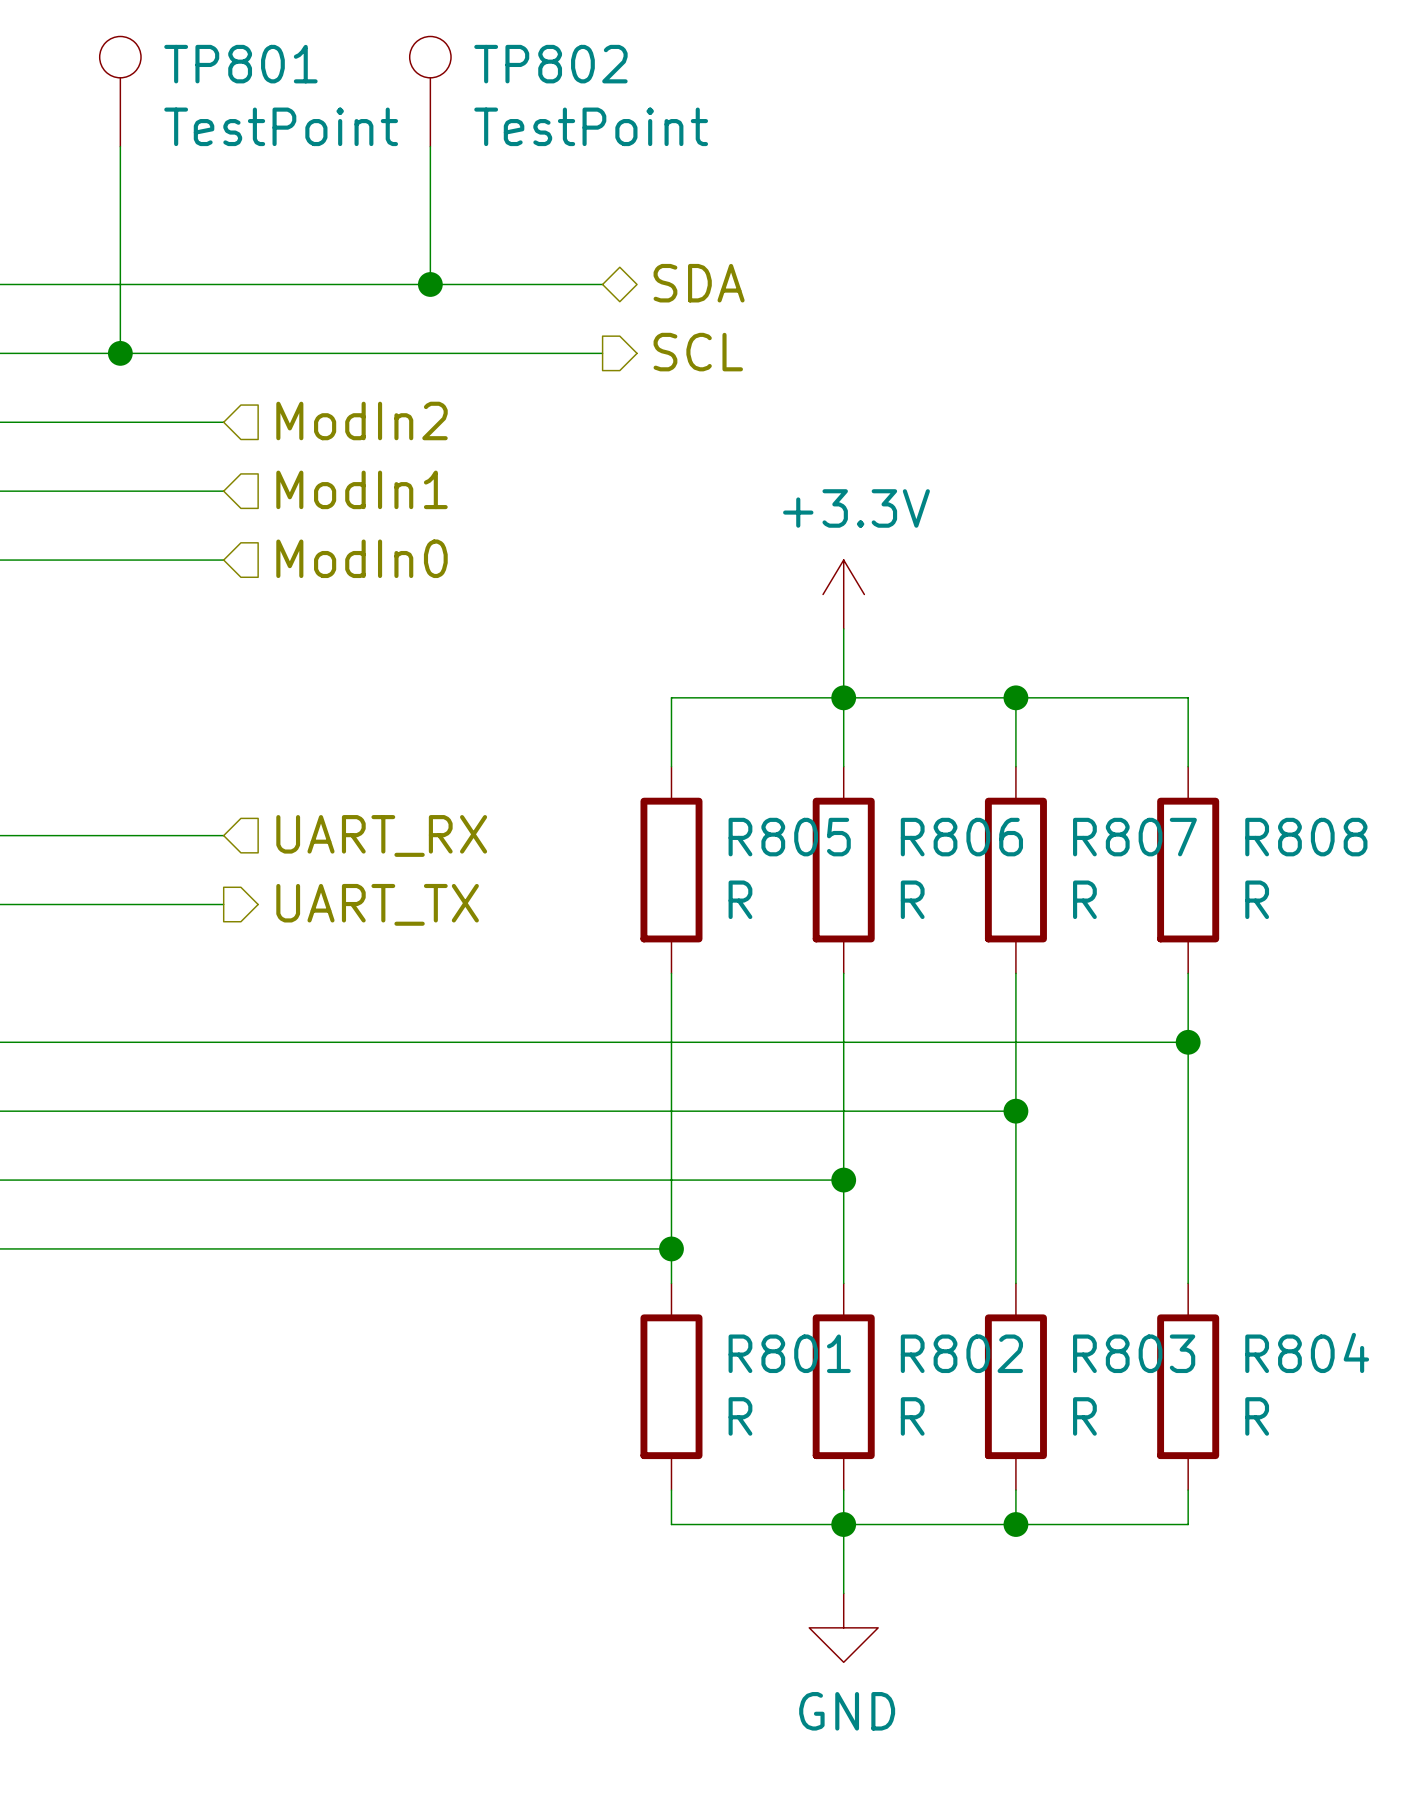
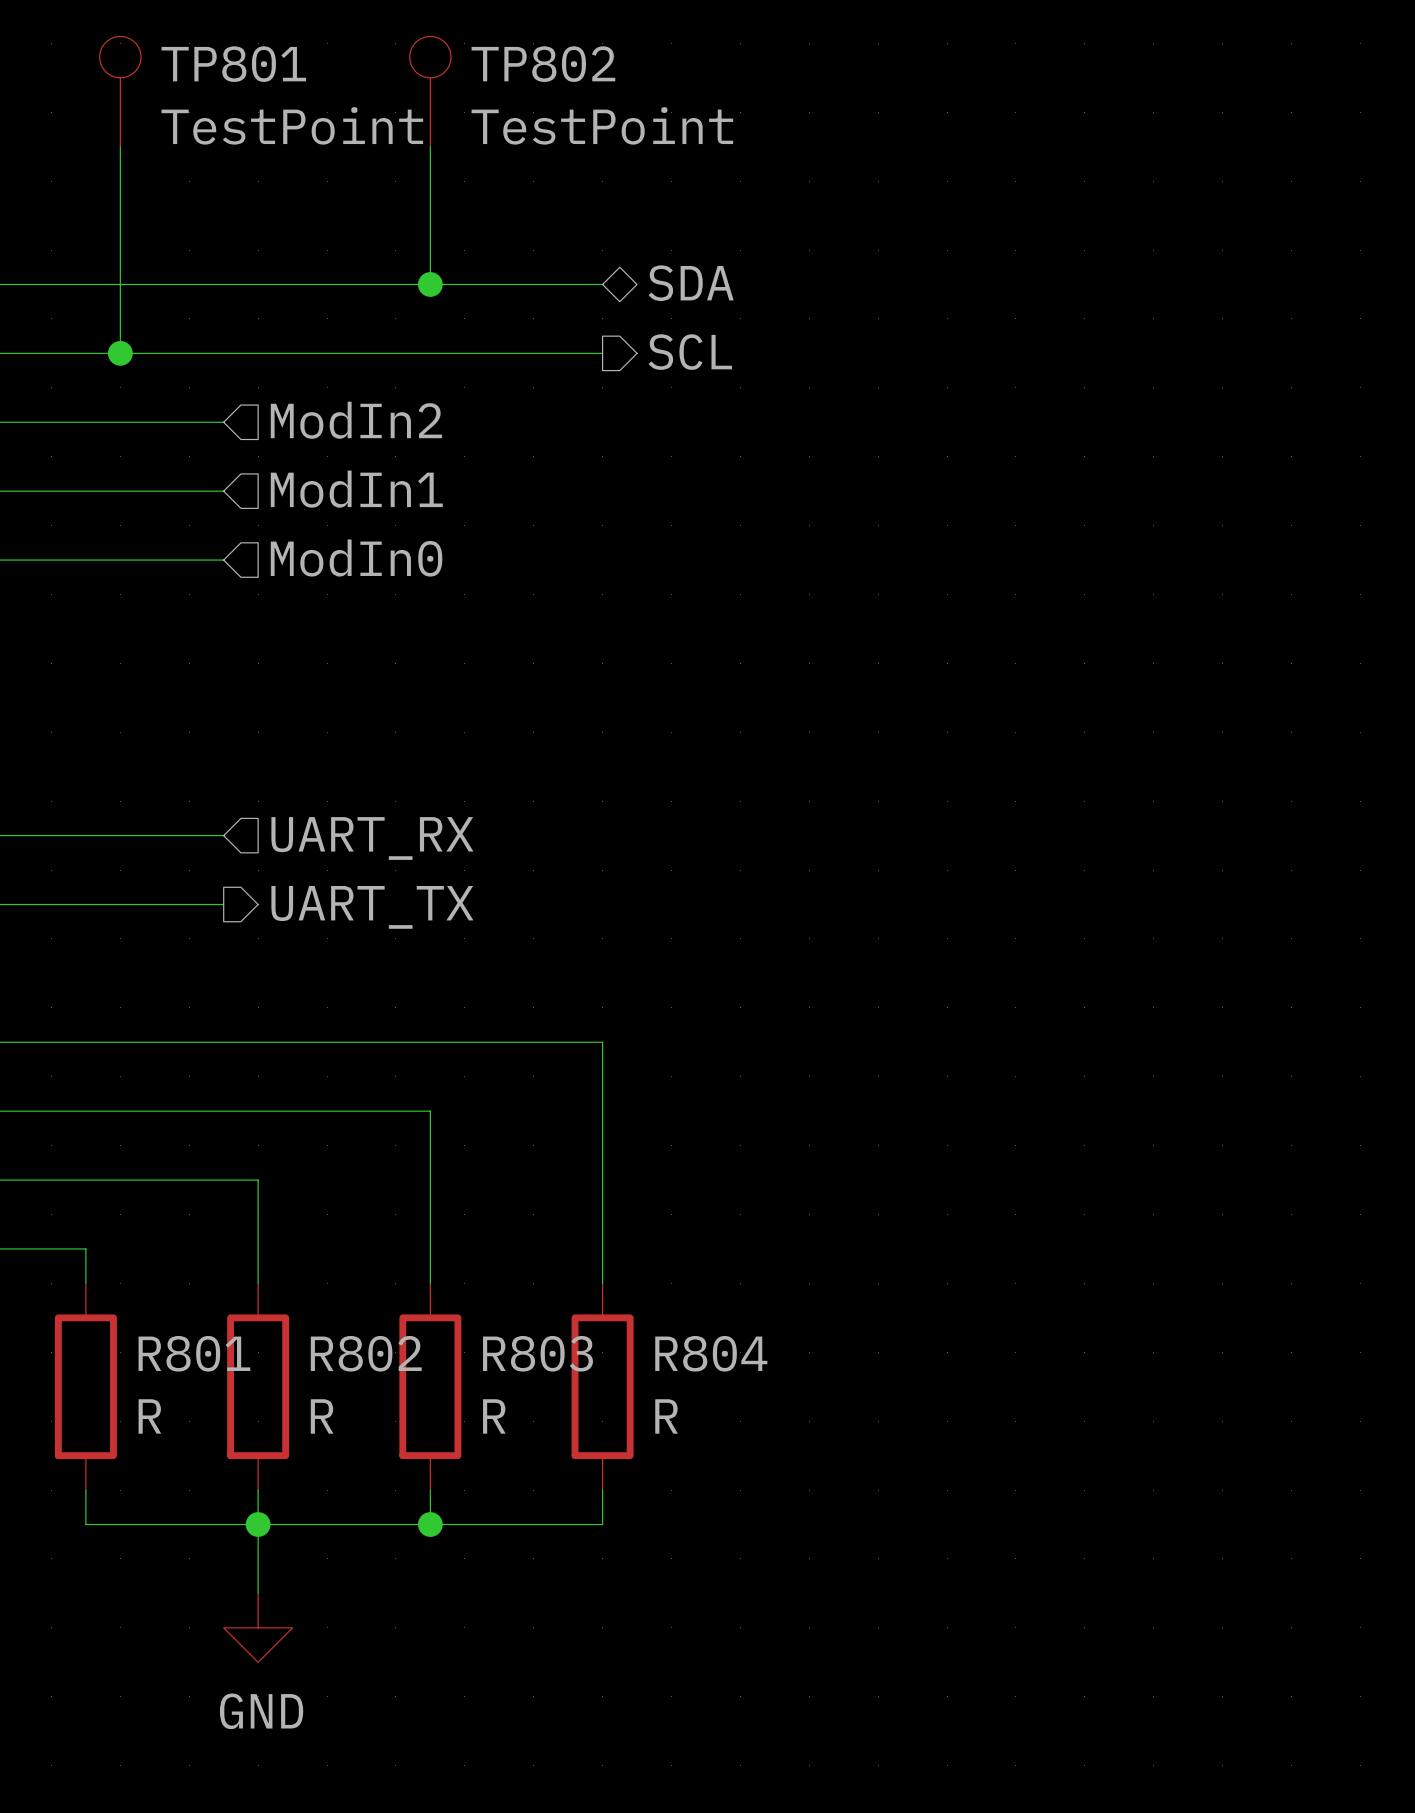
power symbol: +3.3V (843, 594) -> none
wire: (843, 628) (843, 766) -> none
junction: (843, 697) -> none
wire: (1015, 697) (1015, 766) -> none
junction: (1015, 697) -> none
wire: (671, 766) (671, 697) (1188, 697) (1188, 766) -> none
R805: R (671, 870) -> none
R806: R (843, 870) -> none
R807: R (1015, 870) -> none
R808: R (1188, 870) -> none
wire: (671, 973) (671, 1283) -> none
wire: (843, 973) (843, 1283) -> none
wire: (1015, 973) (1015, 1283) -> none
wire: (1188, 973) (1188, 1283) -> none
wire: (602, 1042) (1188, 1042) -> (602, 1042) (602, 1283)
junction: (1188, 1042) -> none
wire: (430, 1111) (1015, 1111) -> (430, 1111) (430, 1283)
junction: (1015, 1111) -> none
wire: (258, 1180) (843, 1180) -> (258, 1180) (258, 1283)
junction: (843, 1180) -> none
wire: (85, 1248) (671, 1248) -> (85, 1248) (85, 1283)
junction: (671, 1248) -> none
R801 position: (671, 1386) -> (85, 1386)
R802 position: (843, 1386) -> (258, 1386)
R803 position: (1015, 1386) -> (430, 1386)
R804 position: (1188, 1386) -> (602, 1386)
wire: (671, 1490) (671, 1524) (1188, 1524) (1188, 1490) -> (85, 1490) (85, 1524) (602, 1524) (602, 1490)
wire: (843, 1490) (843, 1593) -> (258, 1490) (258, 1593)
wire: (1015, 1490) (1015, 1524) -> (430, 1490) (430, 1524)
junction: none -> (258, 1524)
junction: none -> (430, 1524)
junction: (843, 1524) -> none
junction: (1015, 1524) -> none
power symbol position: GND (843, 1627) -> GND (258, 1627)

